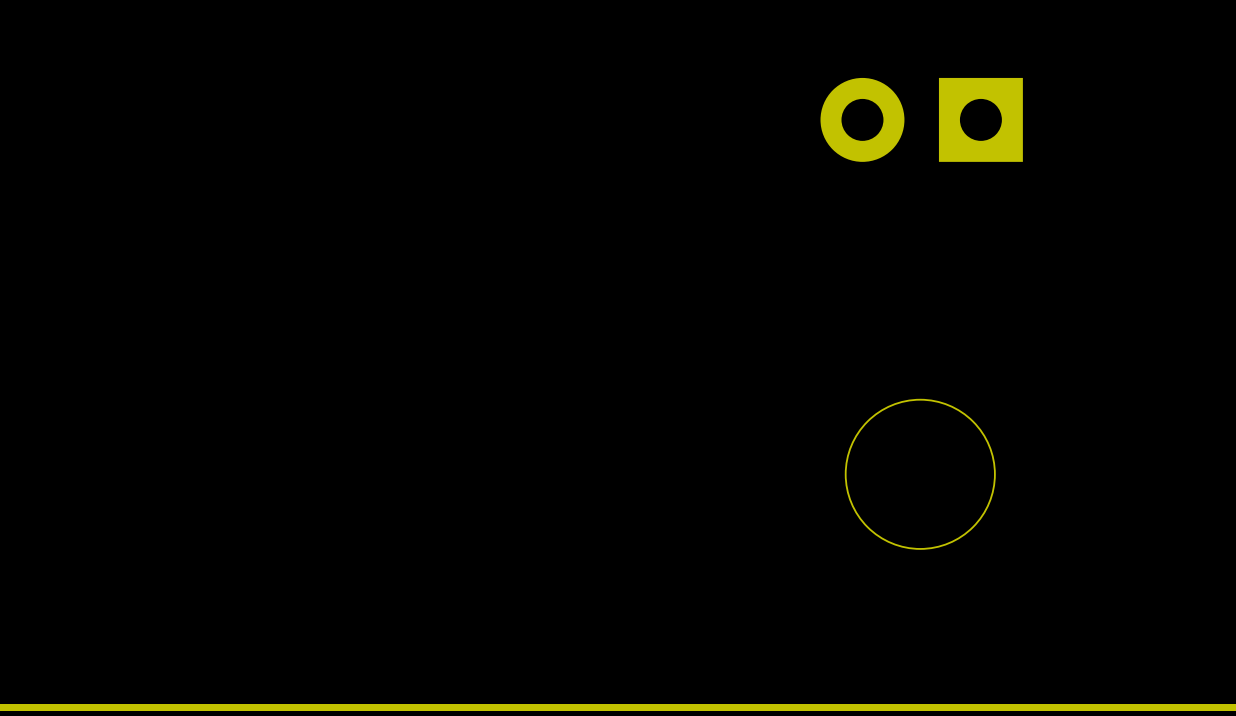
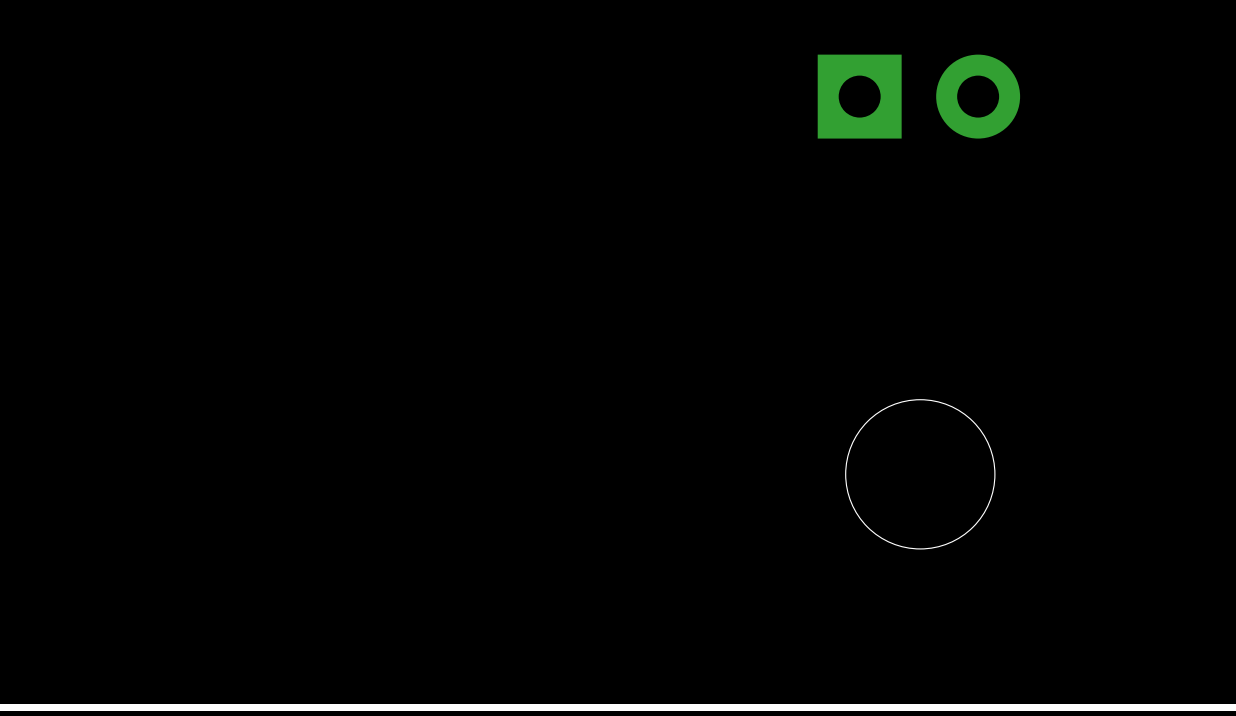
part rotation: 0° (921, 119) -> 180° (918, 96)

